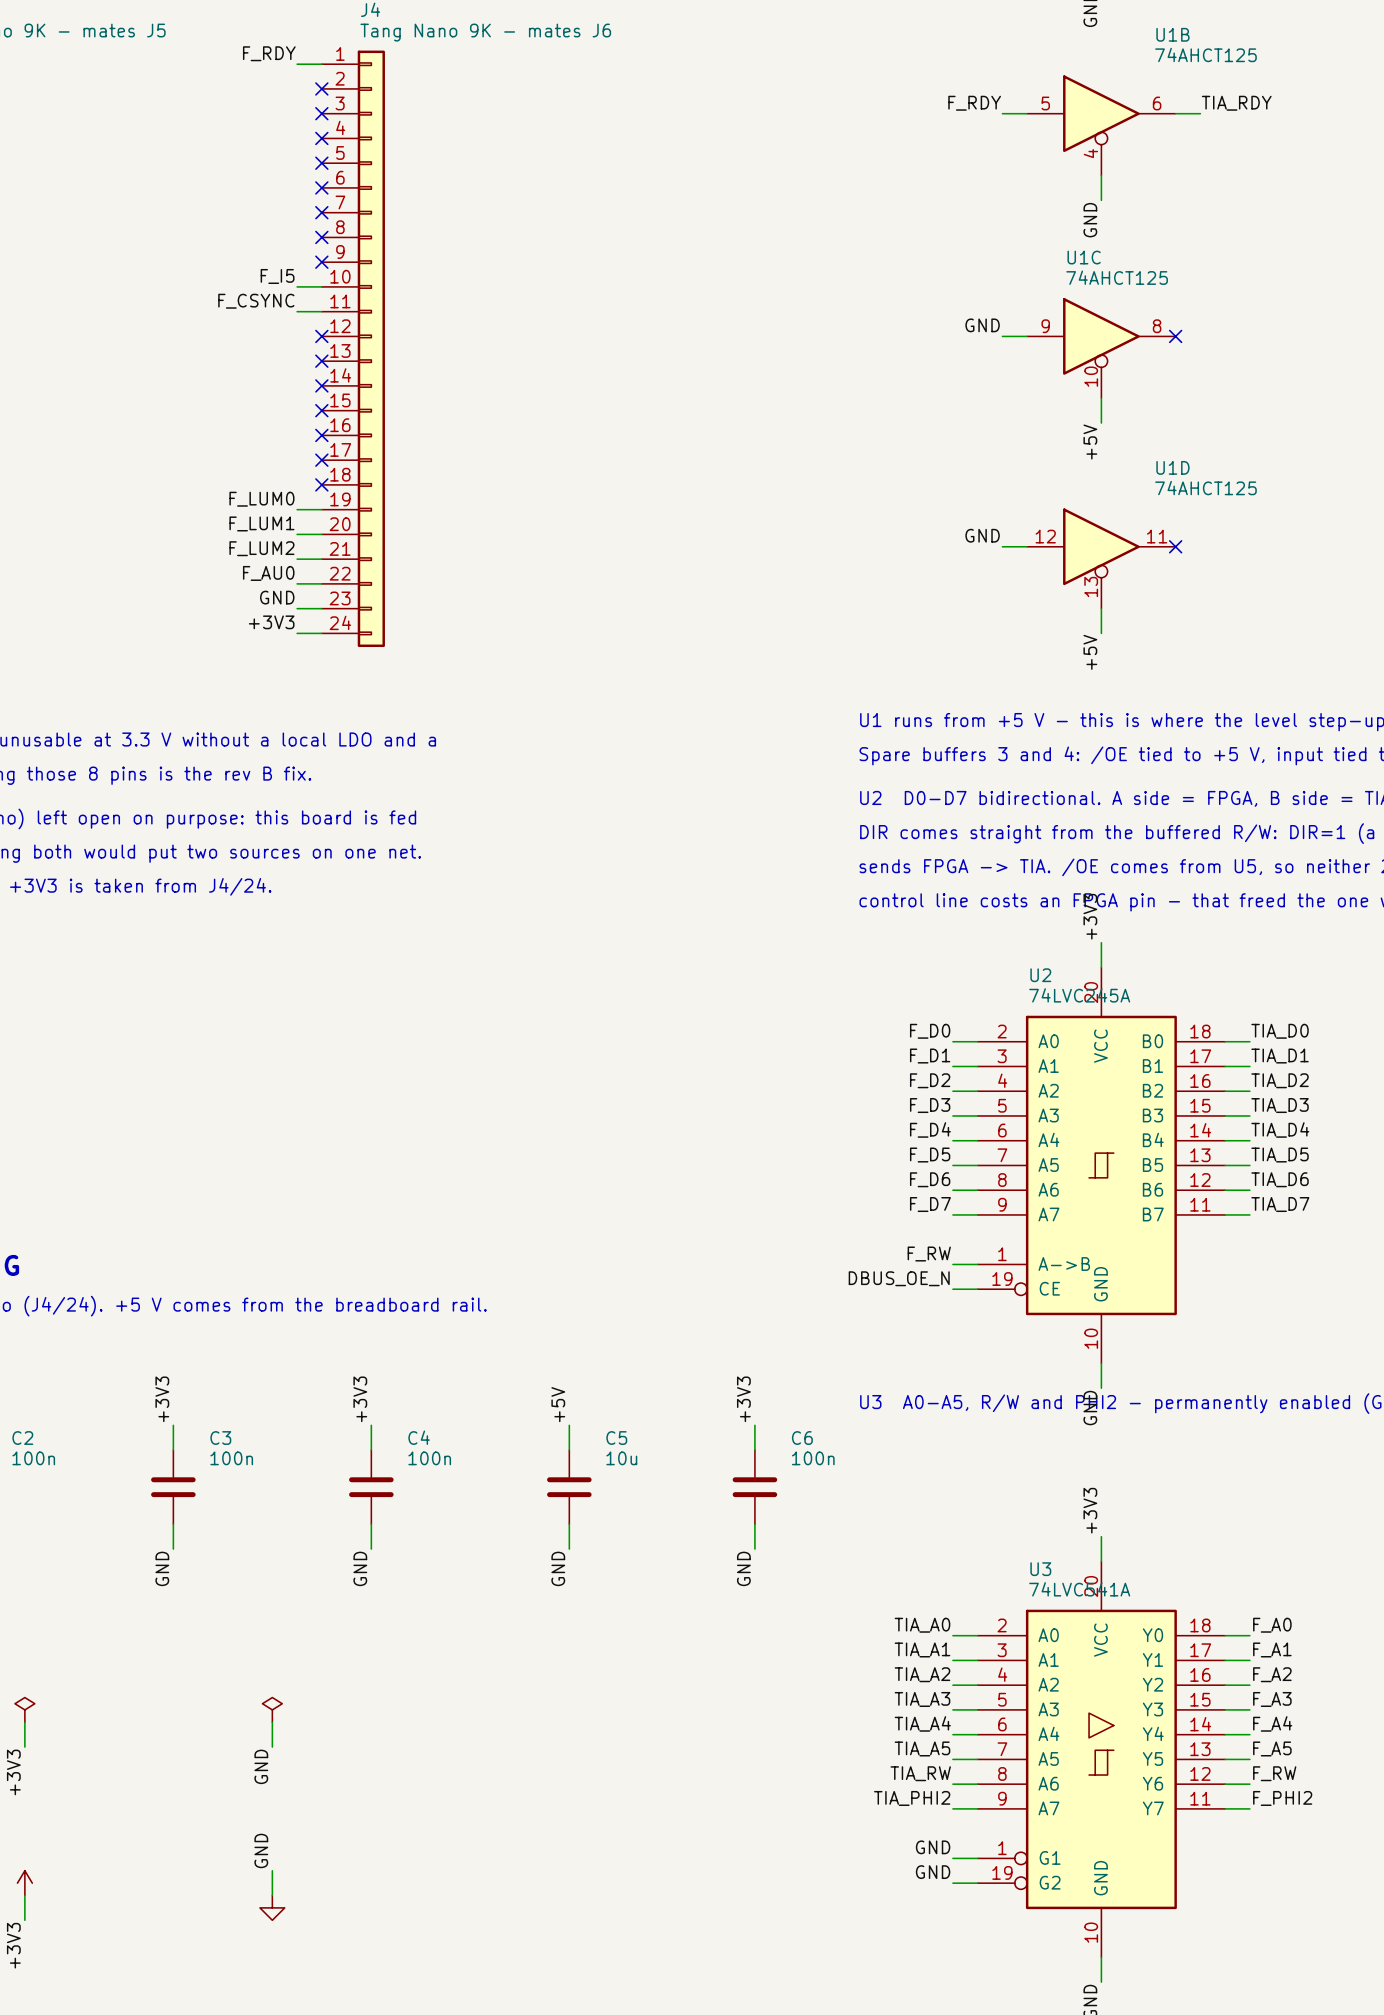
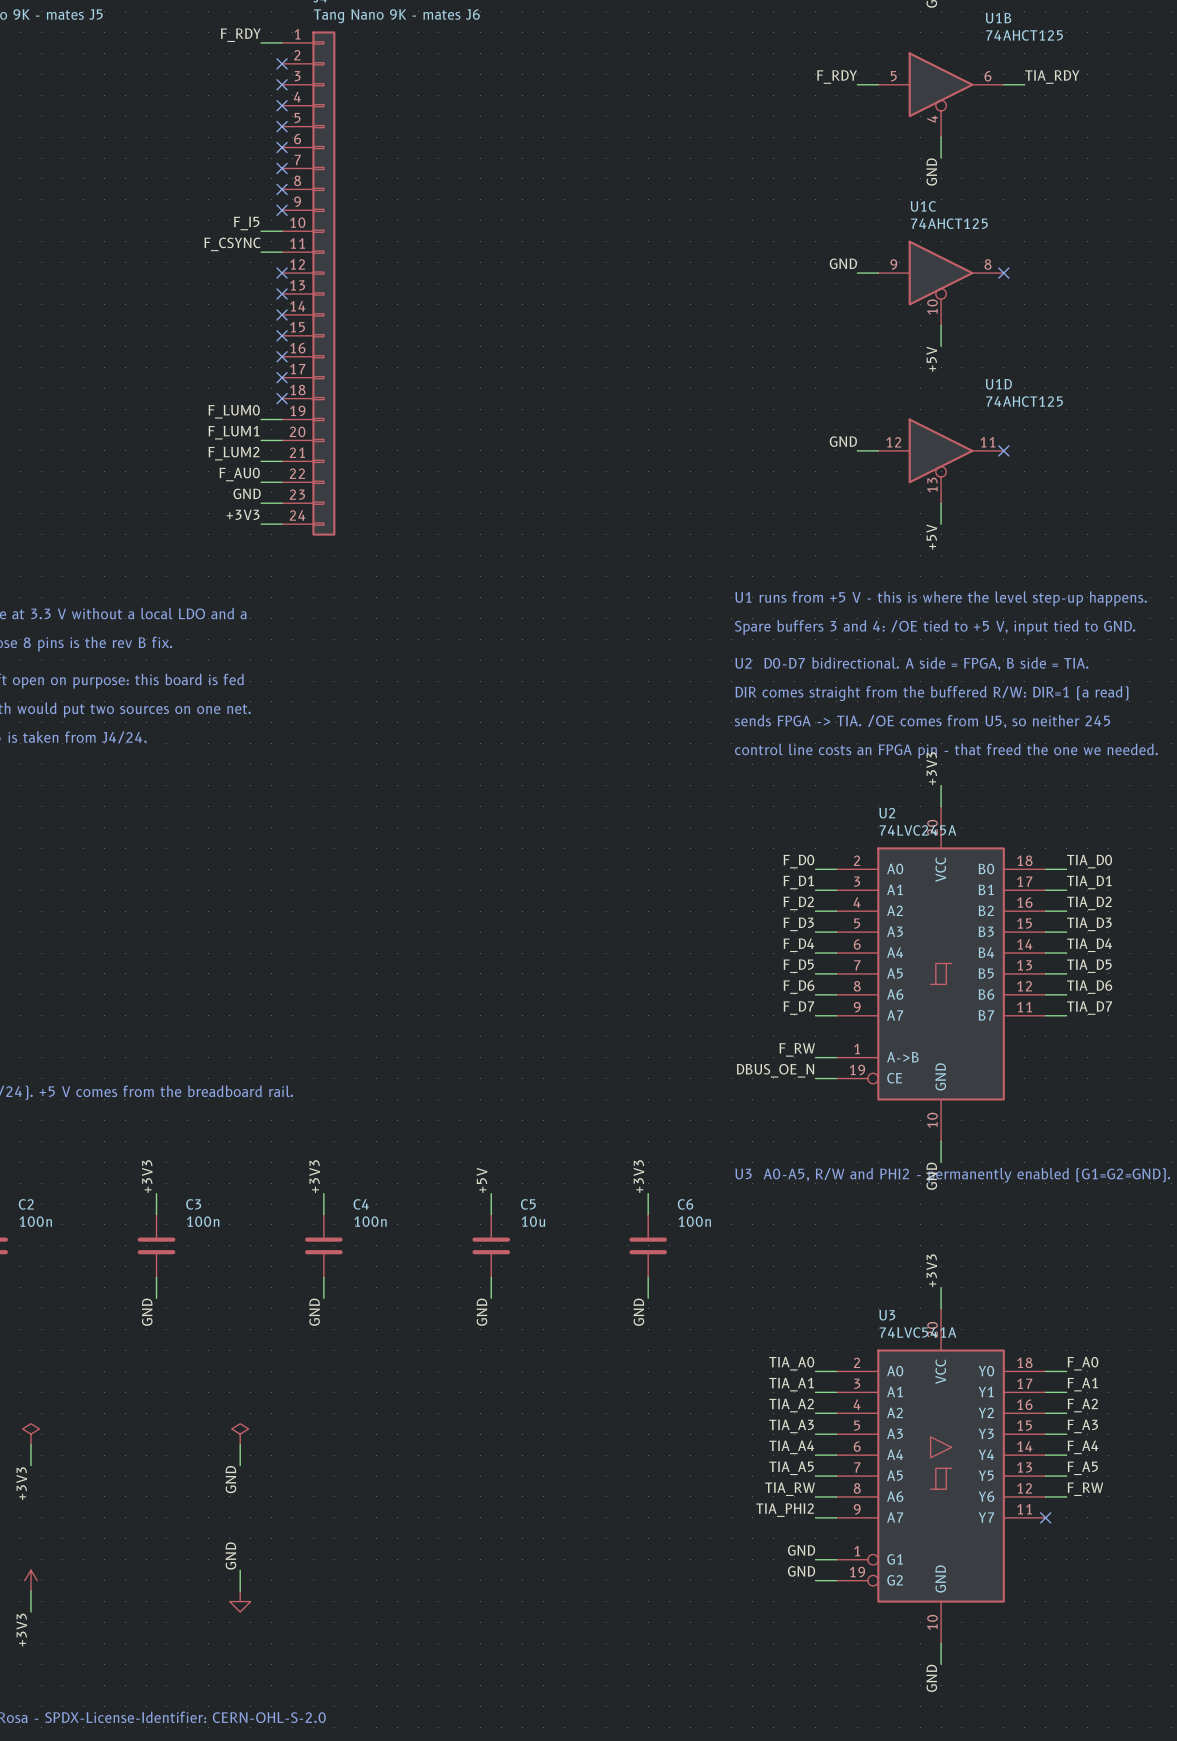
label: F_PHI2 (1282, 1798) -> none
wire: (1225, 1808) (1249, 1808) -> none
no-connect mark: none -> (1045, 1517)

